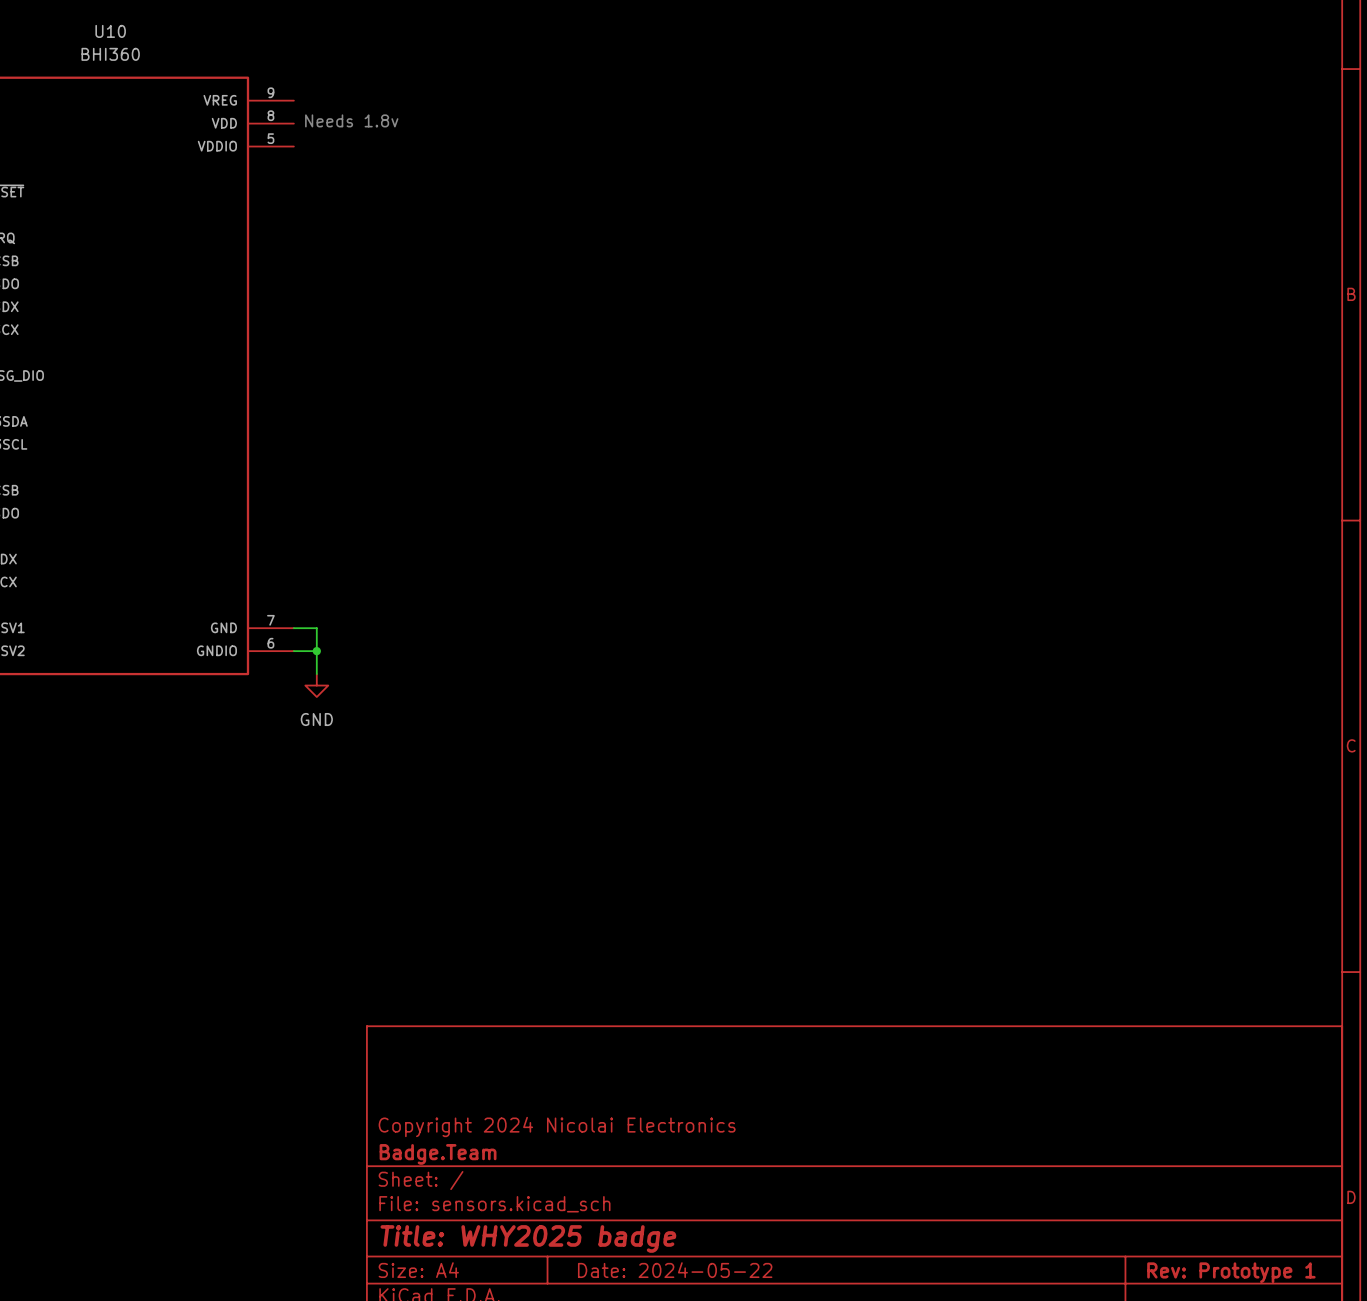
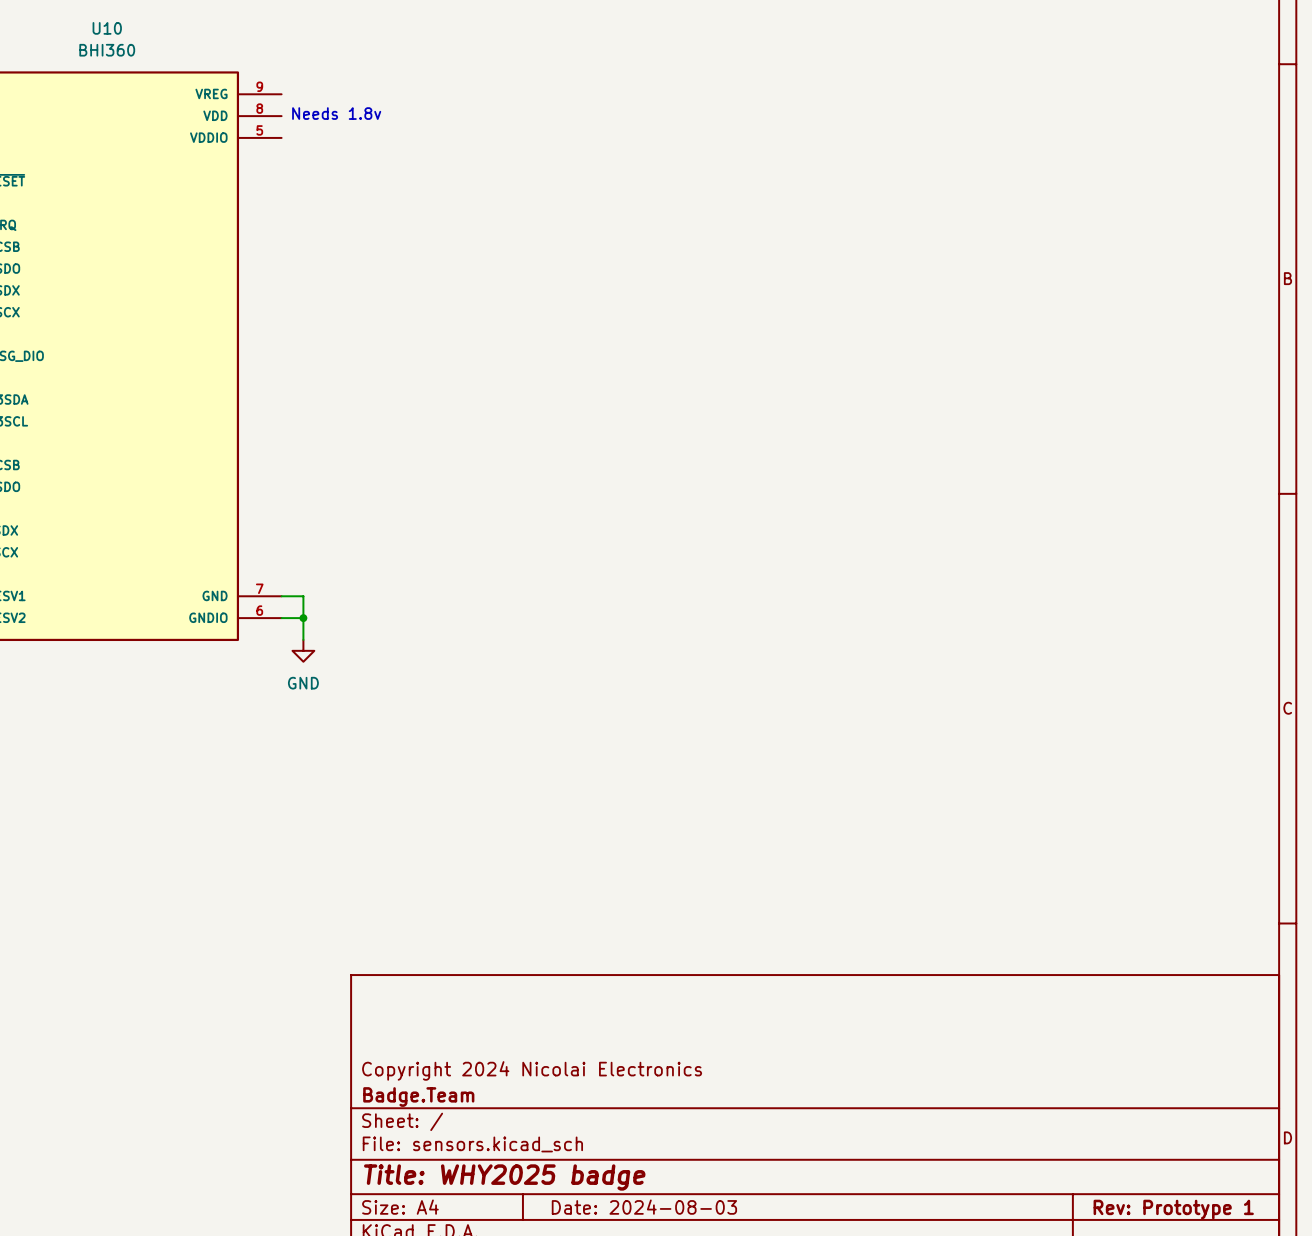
title block: Date: 2024-05-22 (675, 1270) -> Date: 2024-08-03 (644, 1207)

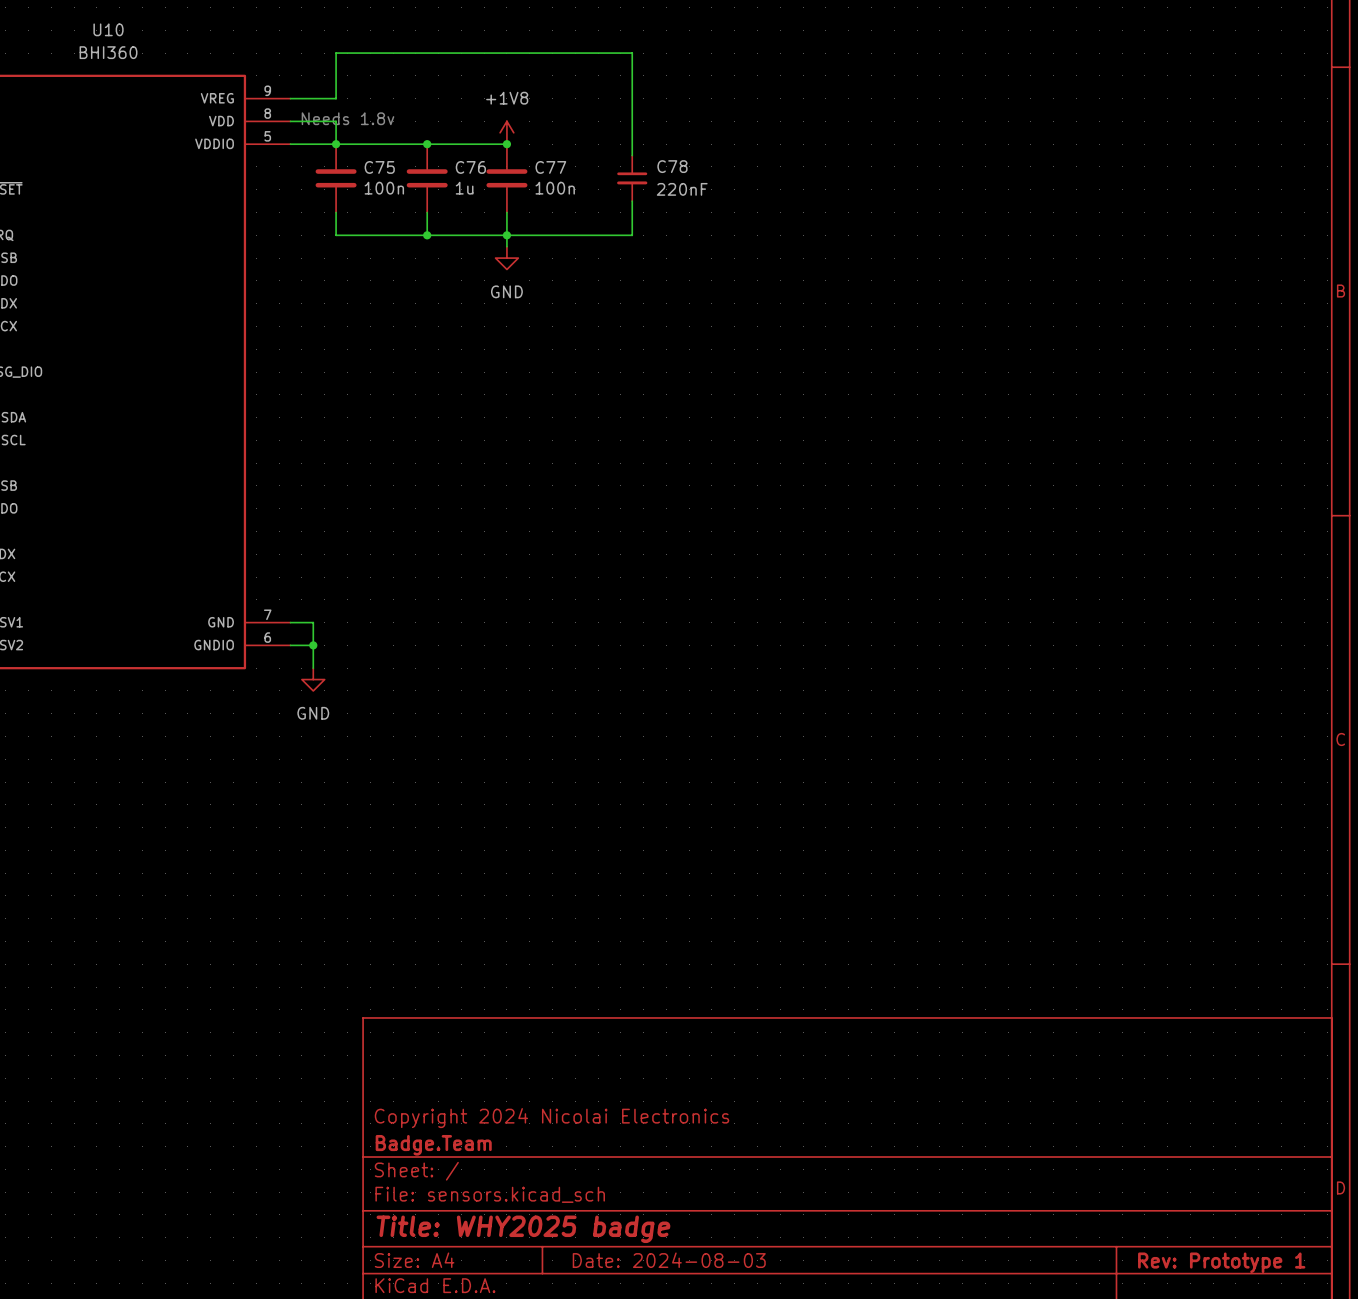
wire: none -> (290, 98) (336, 98) (336, 53) (632, 53) (632, 155)
wire: none -> (290, 121) (336, 121) (336, 144)
power symbol: none -> +1V8 (506, 132)
wire: none -> (290, 144) (506, 144)
junction: none -> (336, 144)
junction: none -> (427, 144)
junction: none -> (506, 144)
C75: none -> 100n (336, 178)
C76: none -> 1u (427, 178)
C77: none -> 100n (506, 178)
C78: none -> 220nF (632, 178)
wire: none -> (632, 201) (632, 235) (336, 235) (336, 212)
wire: none -> (427, 212) (427, 235)
wire: none -> (506, 212) (506, 246)
junction: none -> (427, 235)
junction: none -> (506, 235)
power symbol: none -> GND (506, 258)

